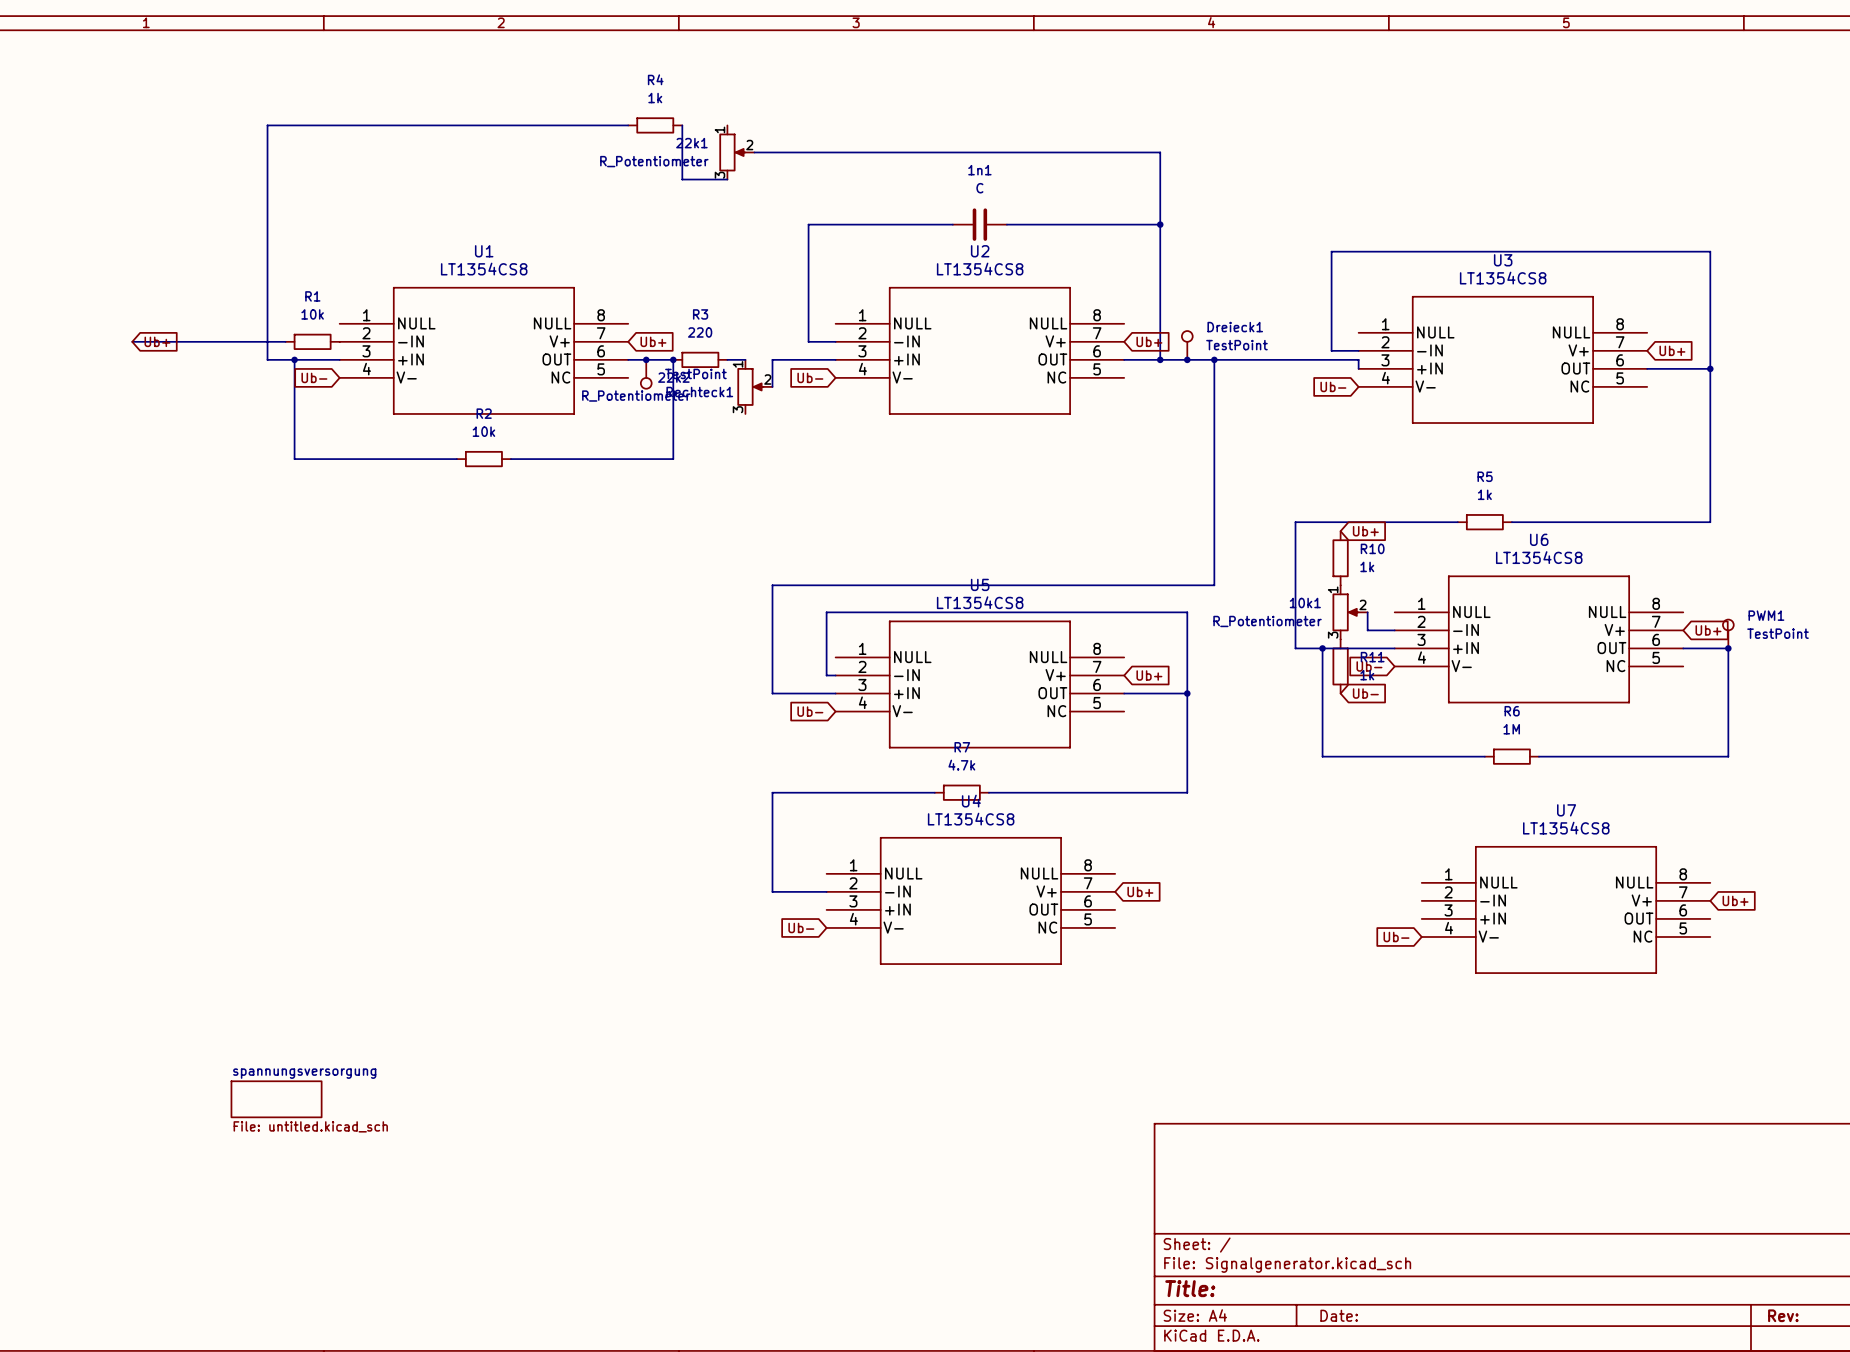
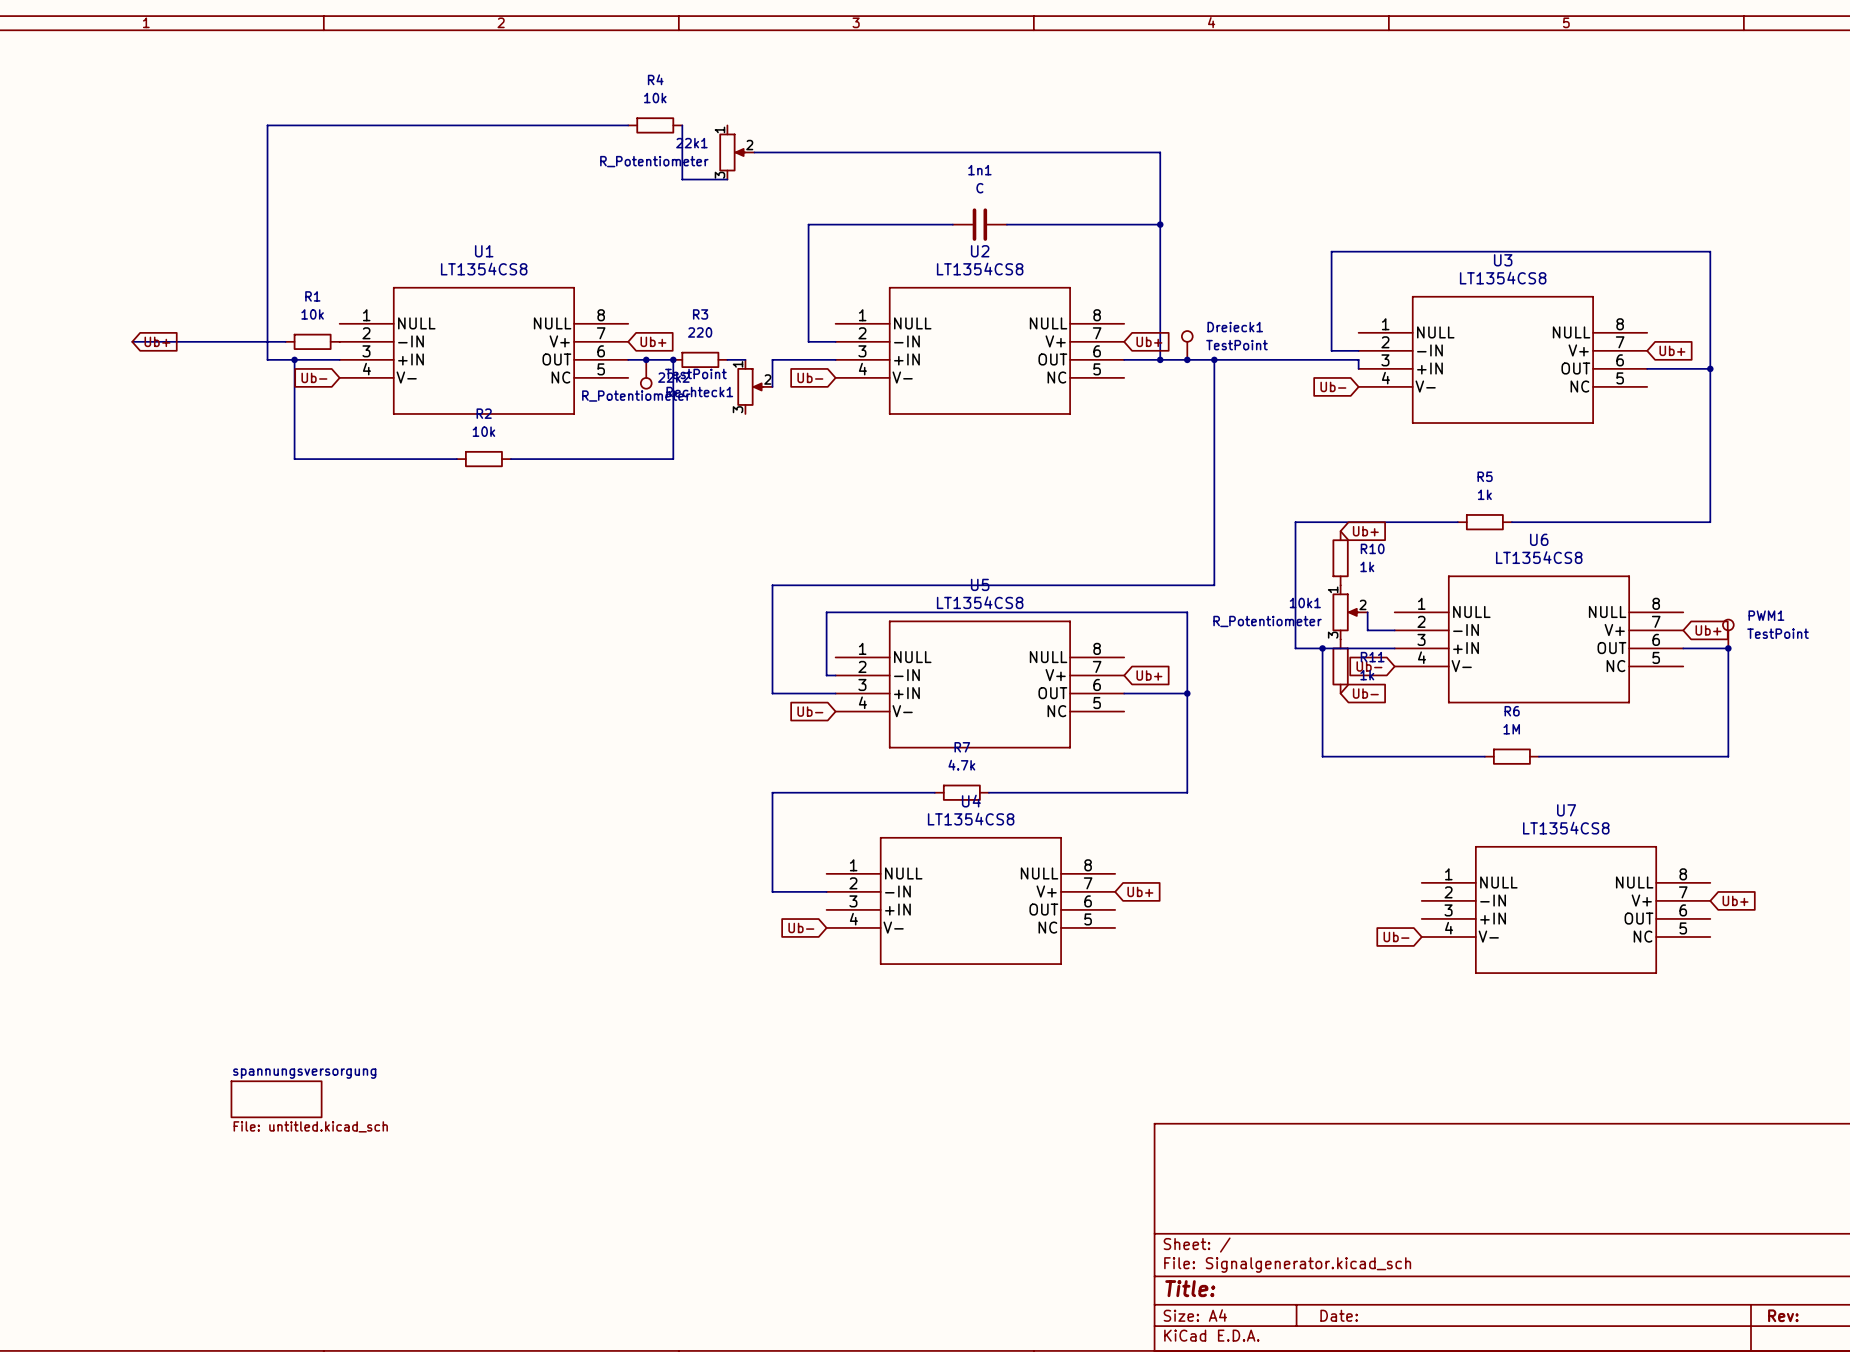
R4 value: 1k (655, 98) -> 10k (655, 98)

